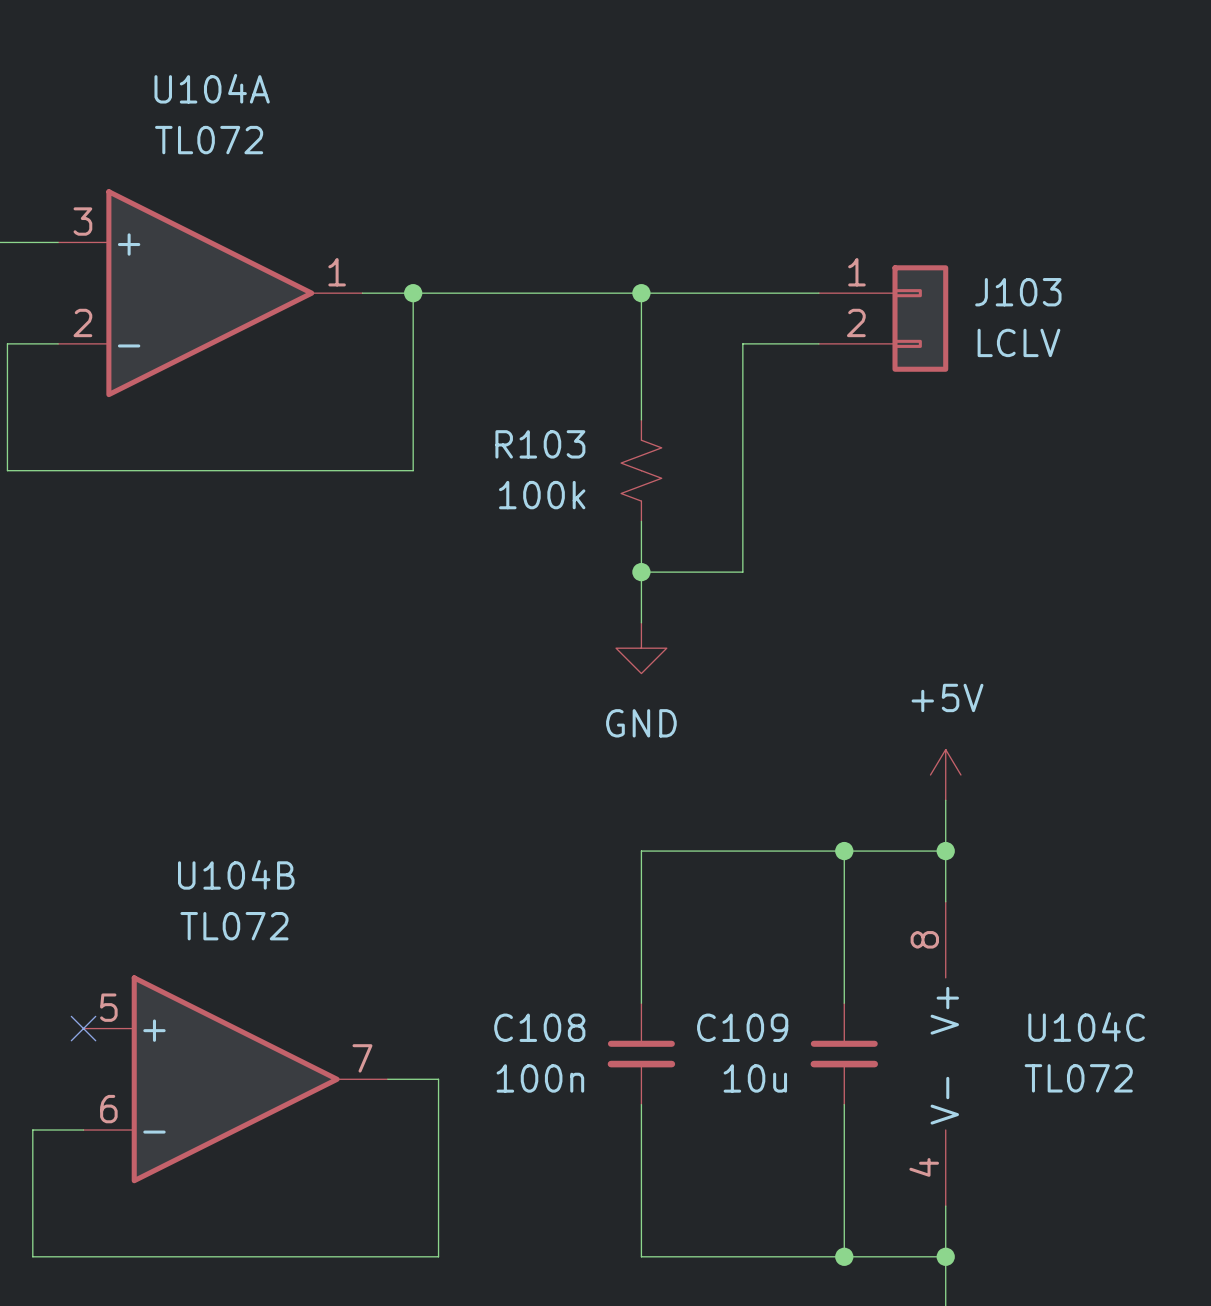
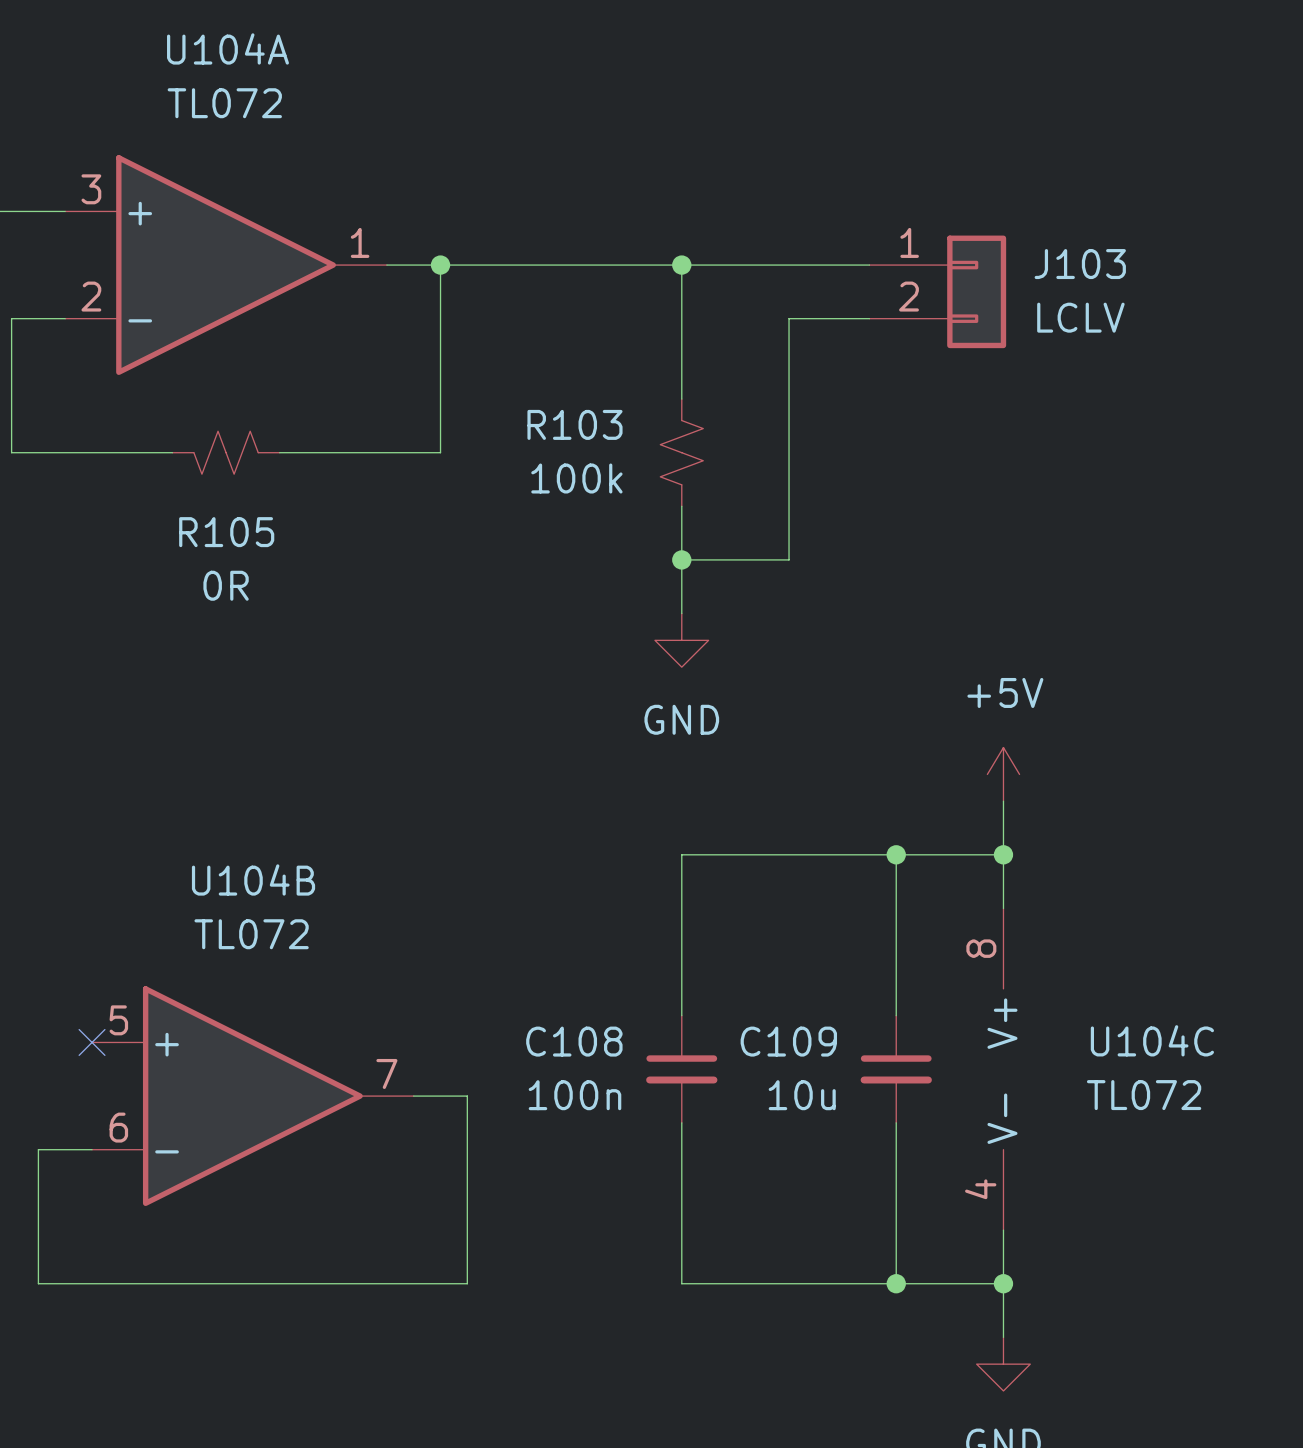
wire: (159, 470) (261, 470) -> none
R105: none -> 0R (226, 452)

